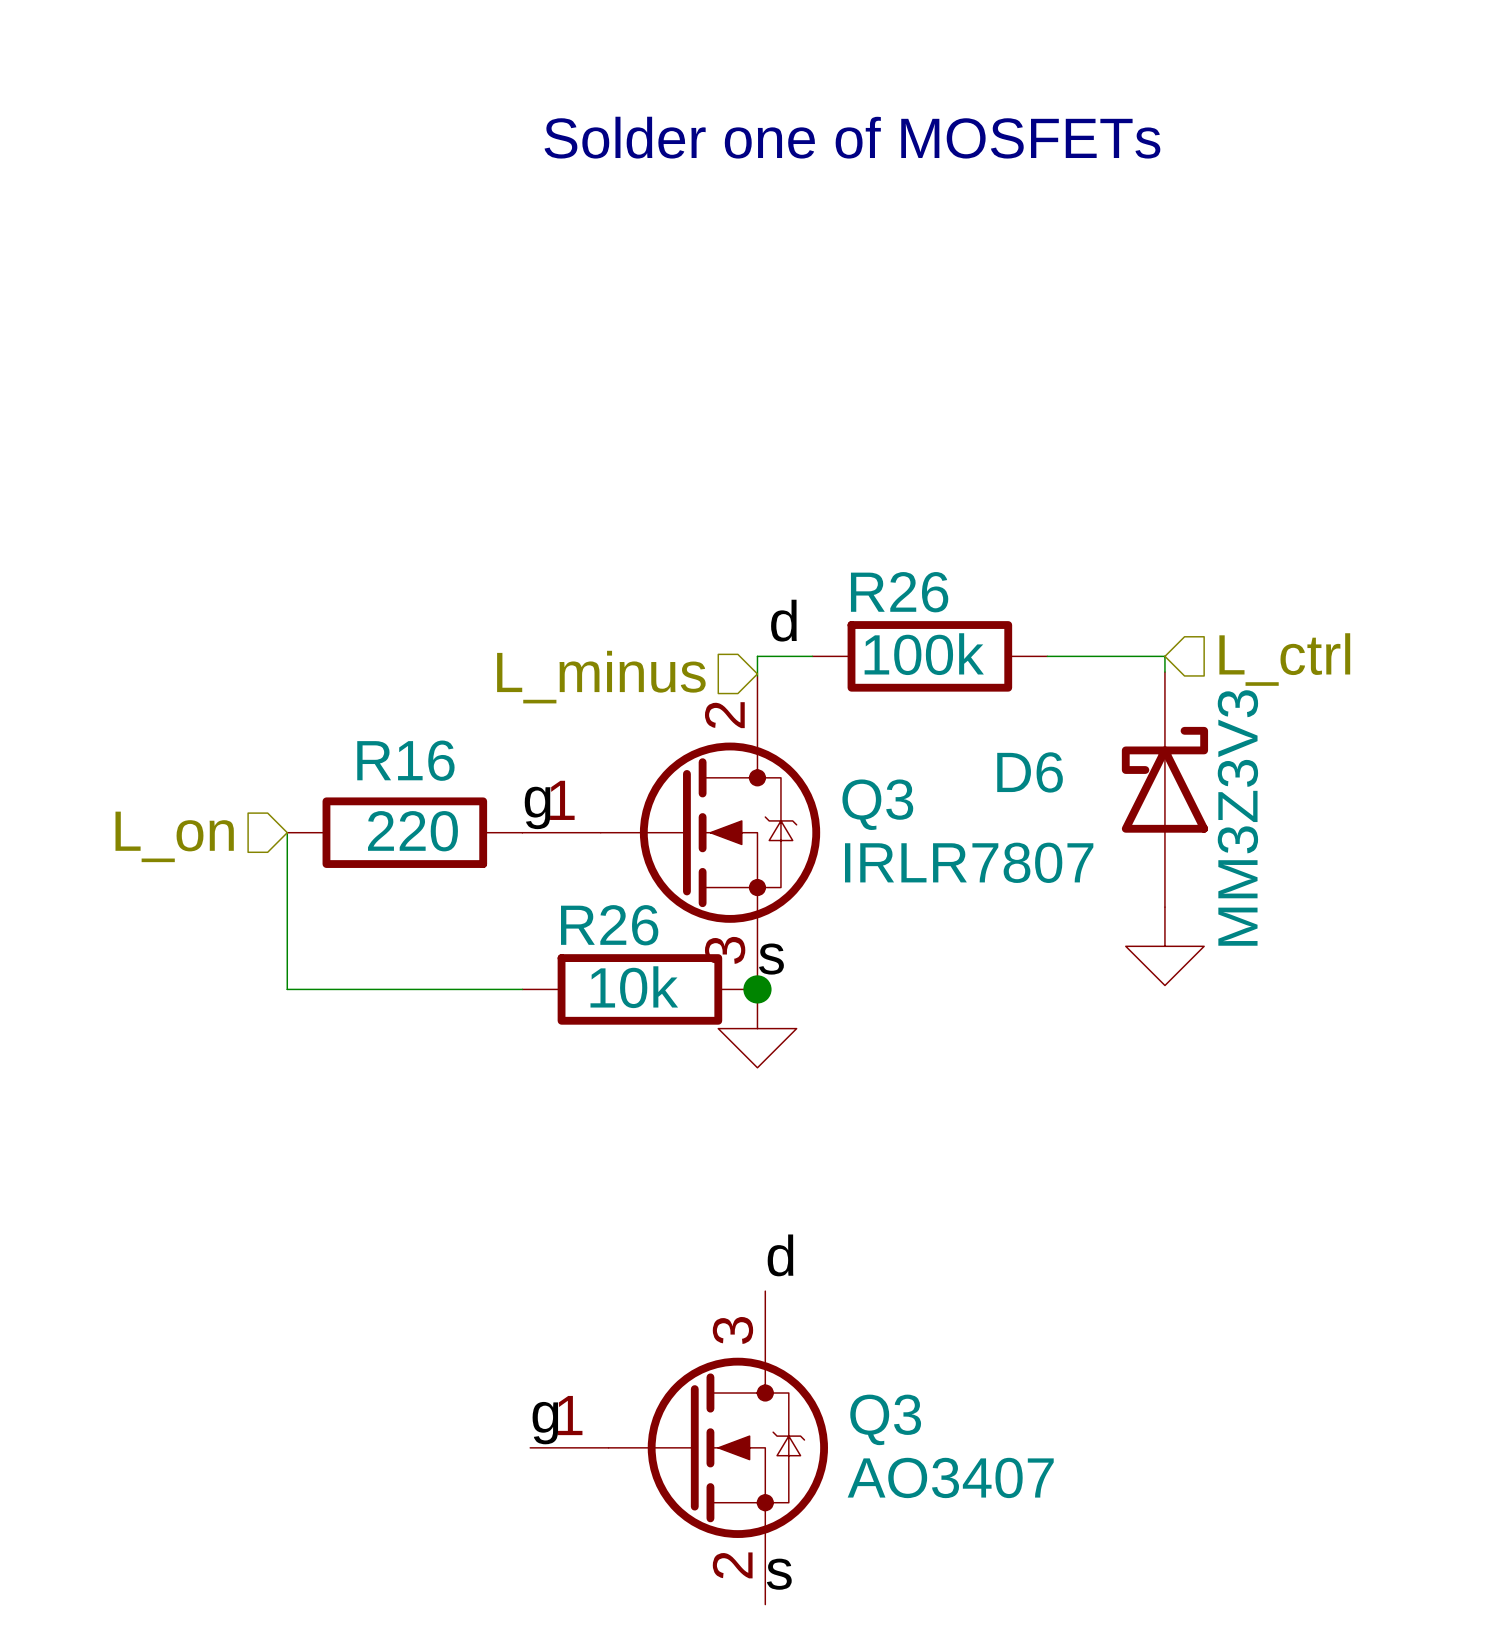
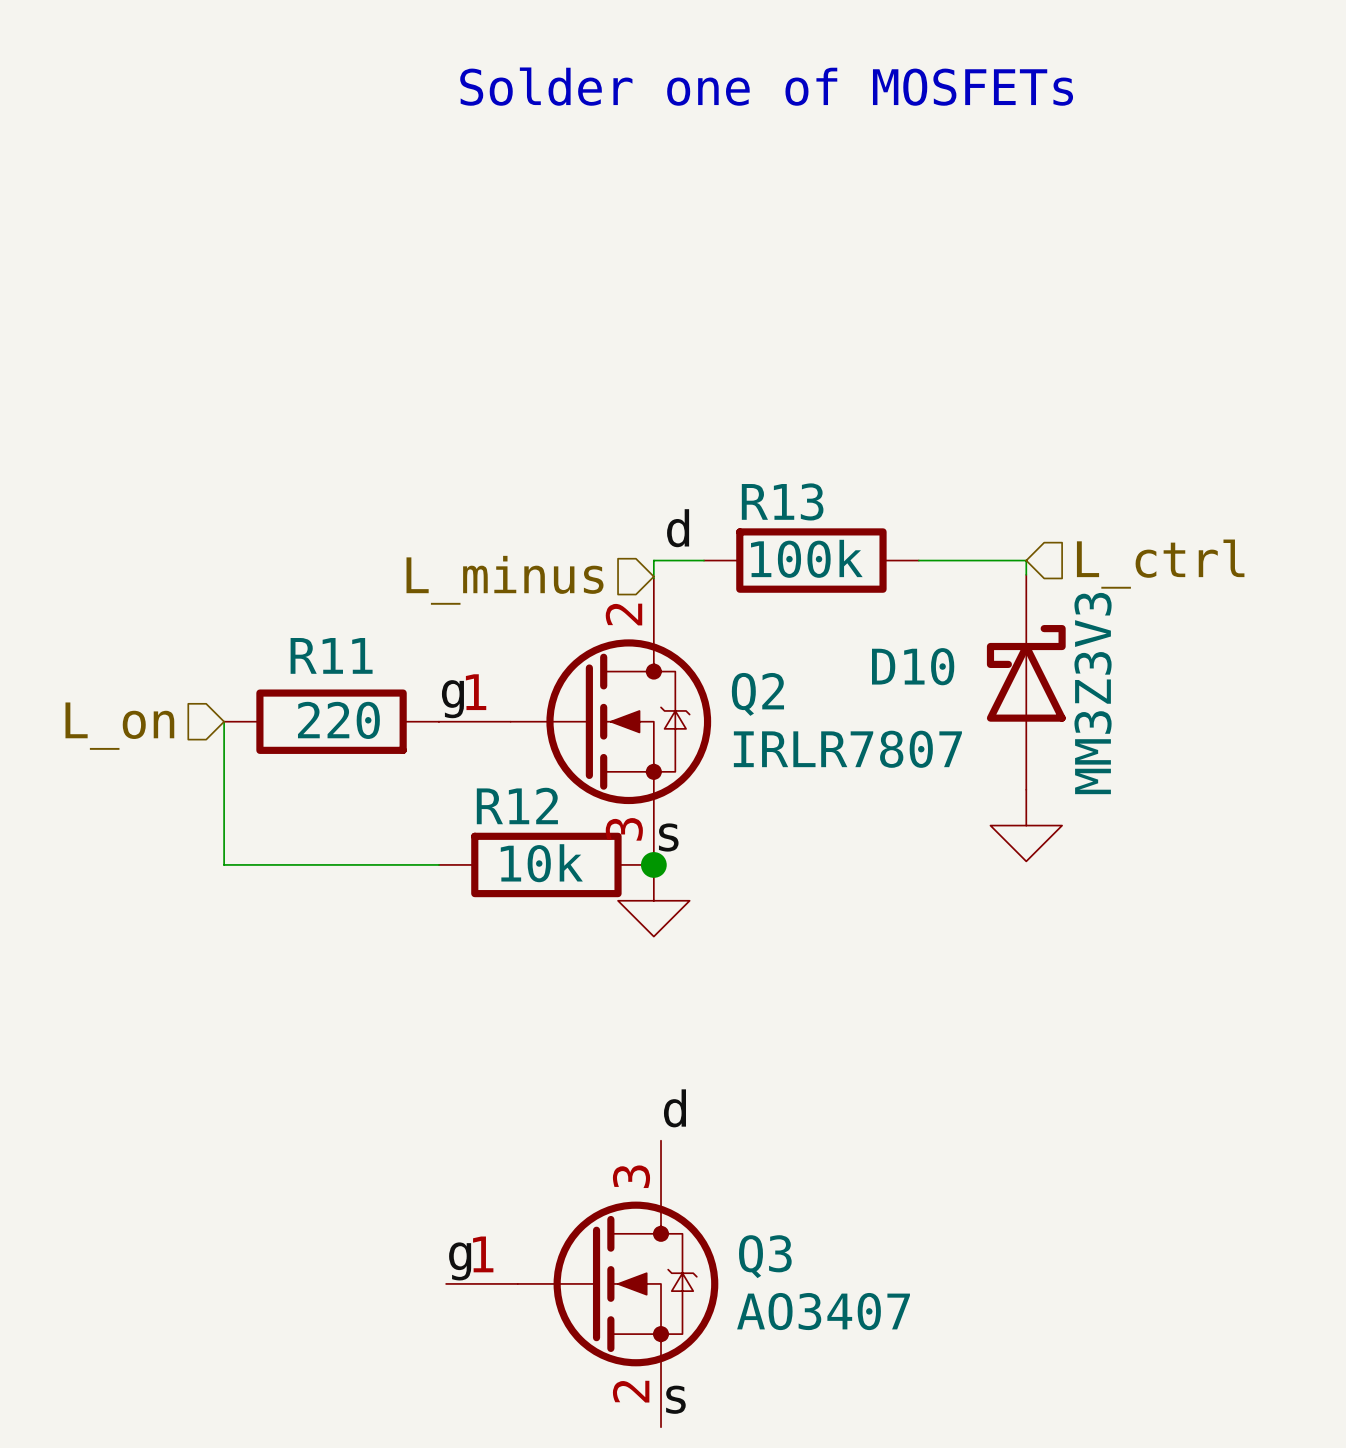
R26 name: R26 (899, 592) -> R13 (782, 501)
R16 name: R16 (405, 760) -> R11 (331, 655)
D6 name: D6 (1030, 772) -> D10 (913, 666)
Q3 name: Q3 (877, 804) -> Q2 (757, 694)
R26 name: R26 (609, 925) -> R12 (517, 806)

